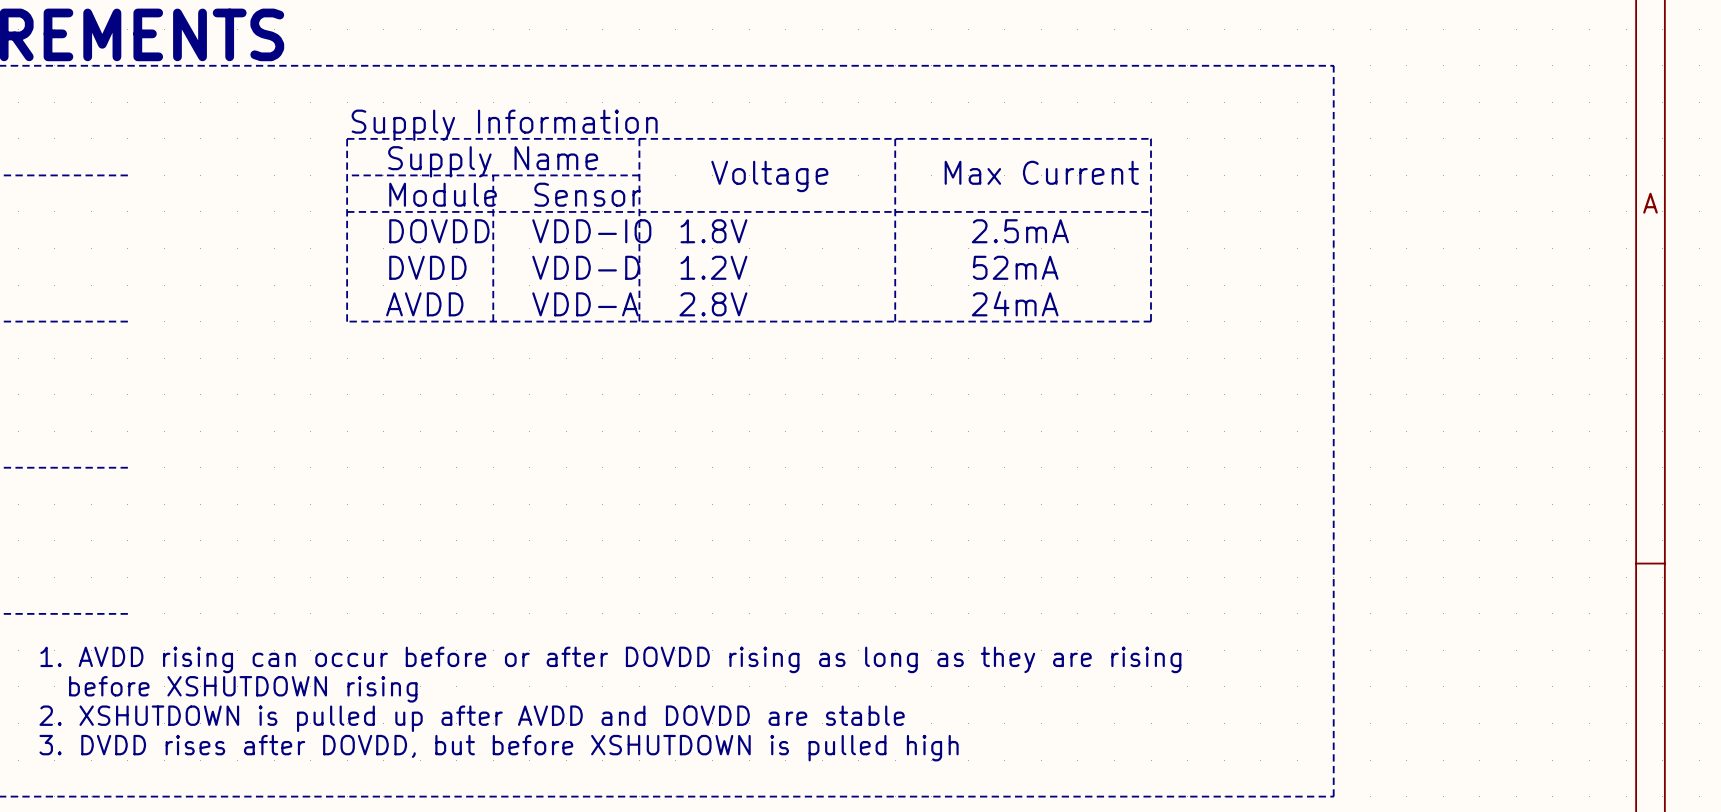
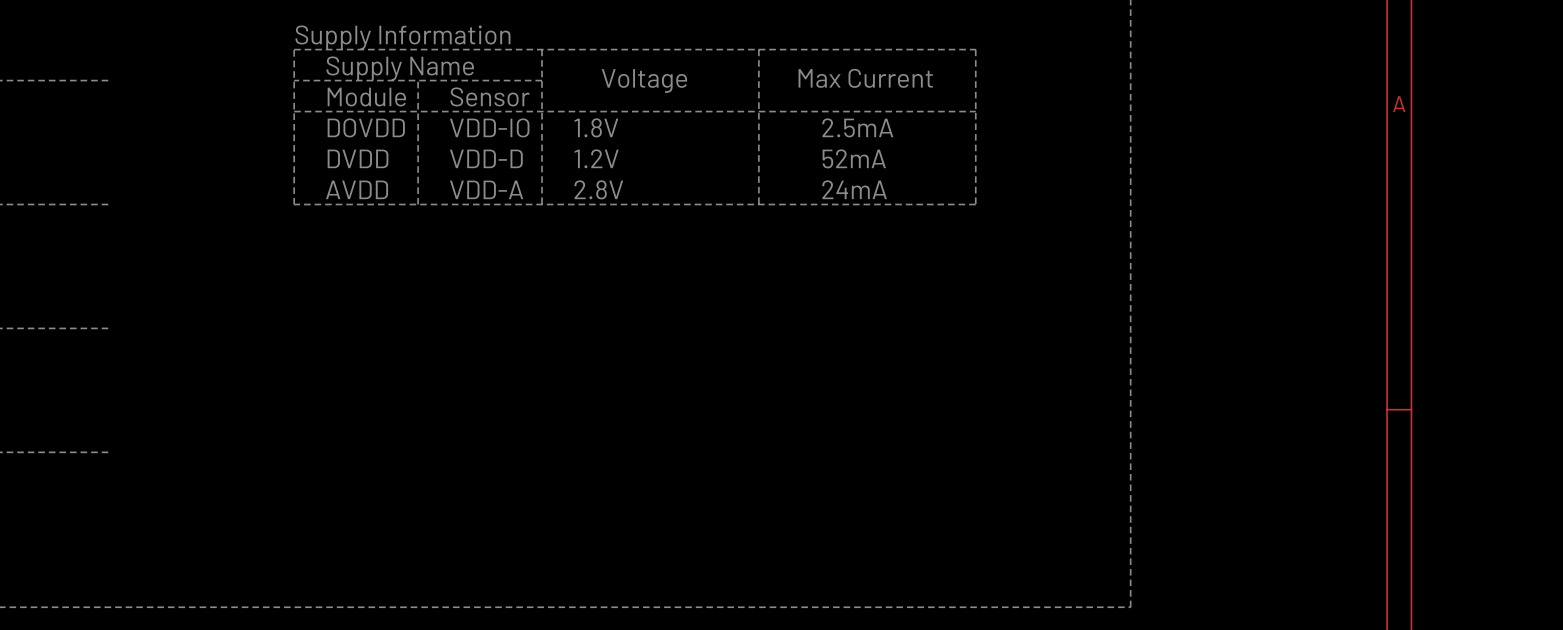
text: 1. AVDD rising can occur before or after DOVDD rising as long as they are rising (610, 659) -> none
text: before XSHUTDOWN rising (243, 689) -> none
text: 2. XSHUTDOWN is pulled up after AVDD and DOVDD are stable (472, 718) -> none
text: 3. DVDD rises after DOVDD, but before XSHUTDOWN is pulled high (499, 748) -> none

